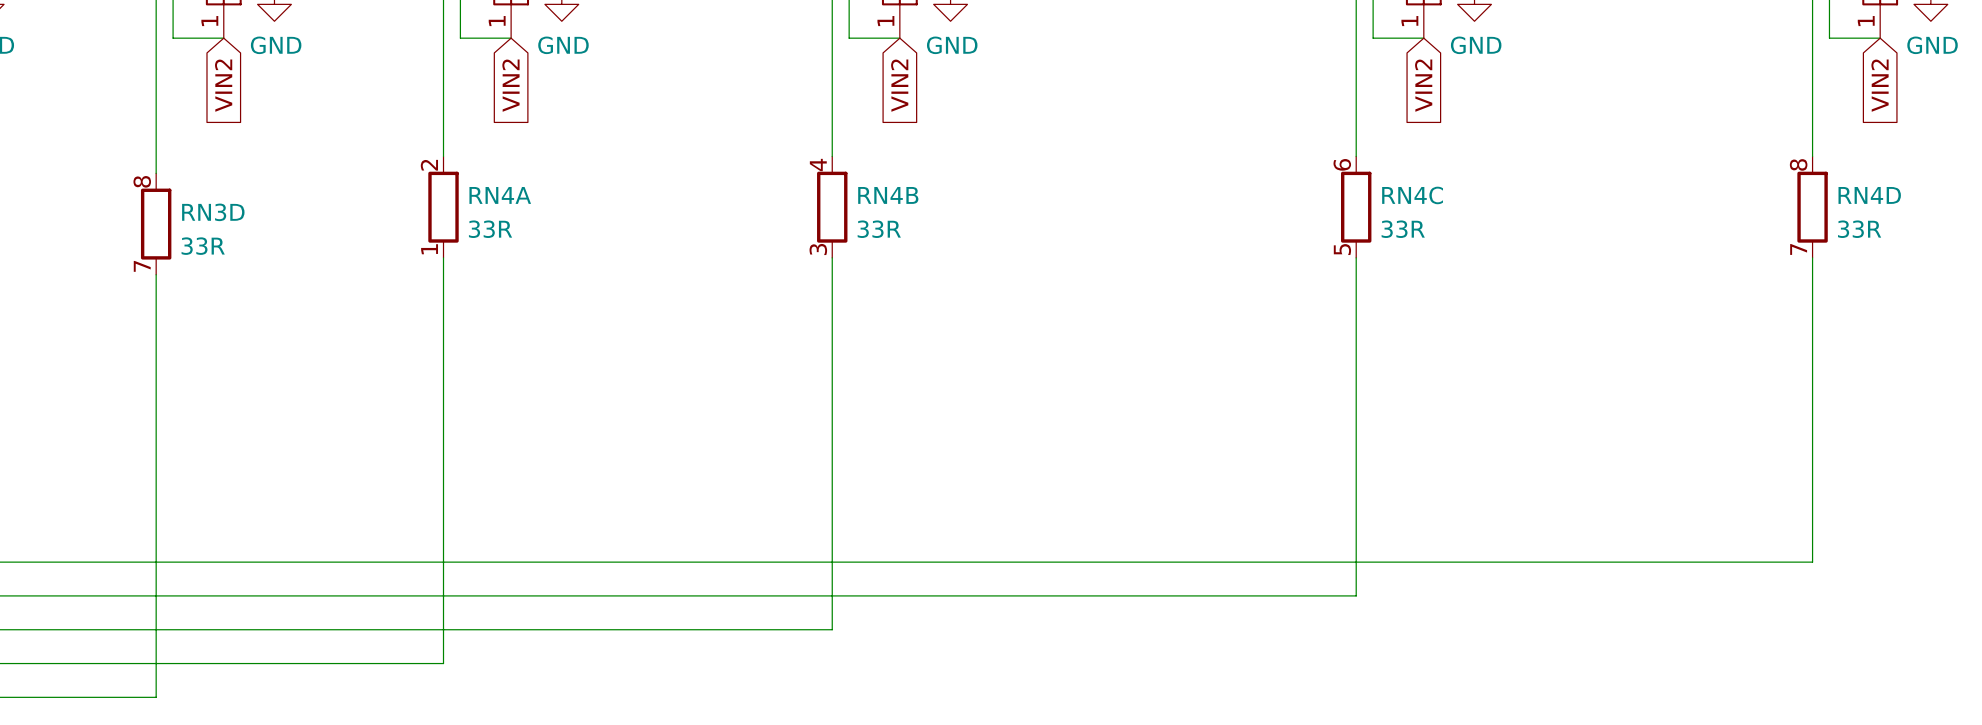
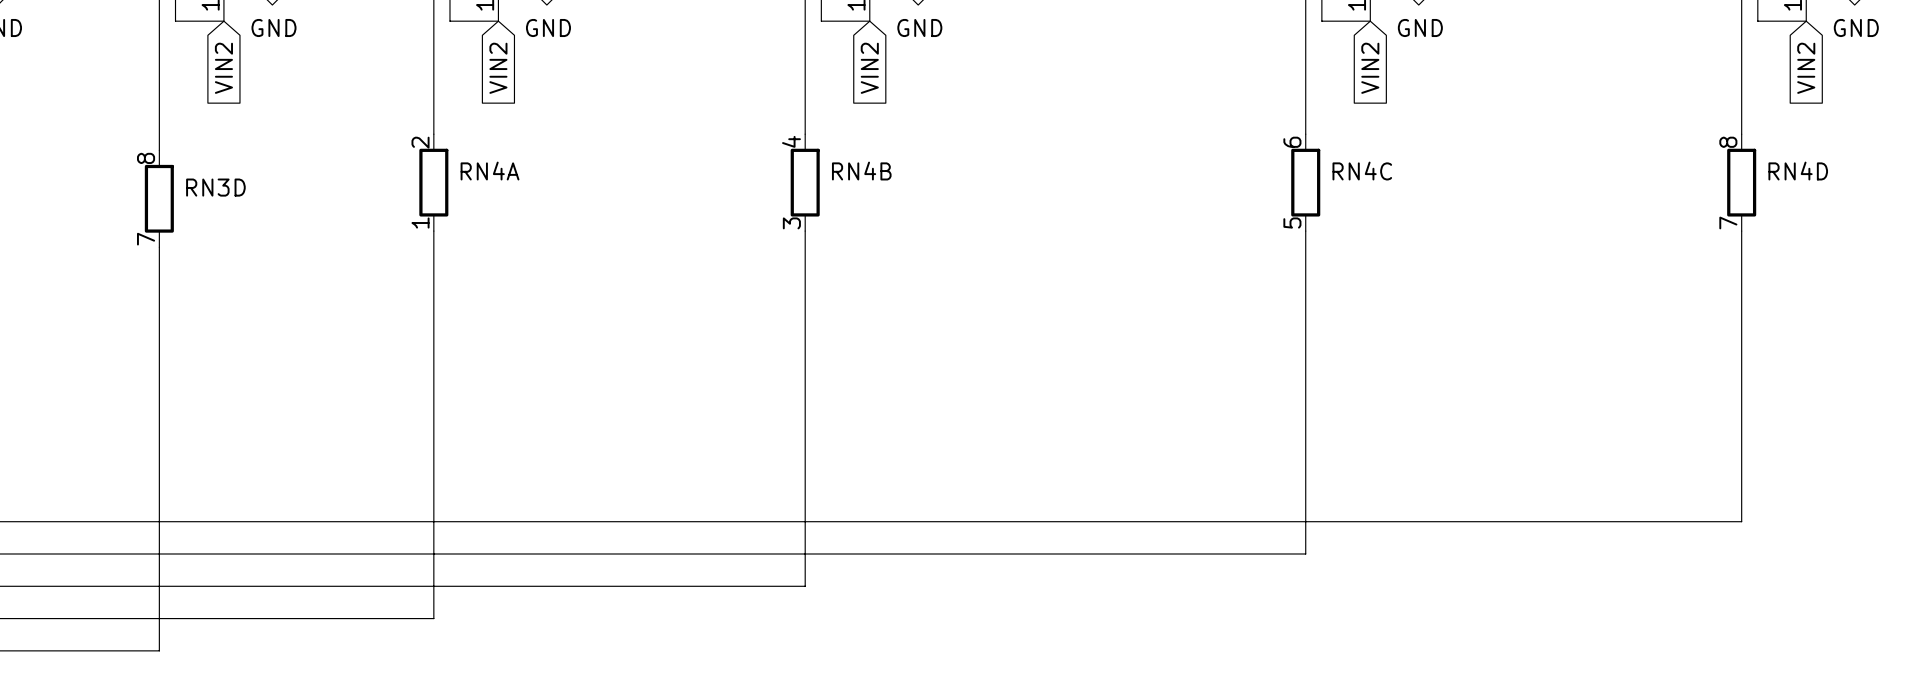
RN4A value: 33R (490, 229) -> none
RN4B value: 33R (879, 229) -> none
RN4C value: 33R (1403, 229) -> none
RN4D value: 33R (1859, 229) -> none
RN3D value: 33R (203, 246) -> none

